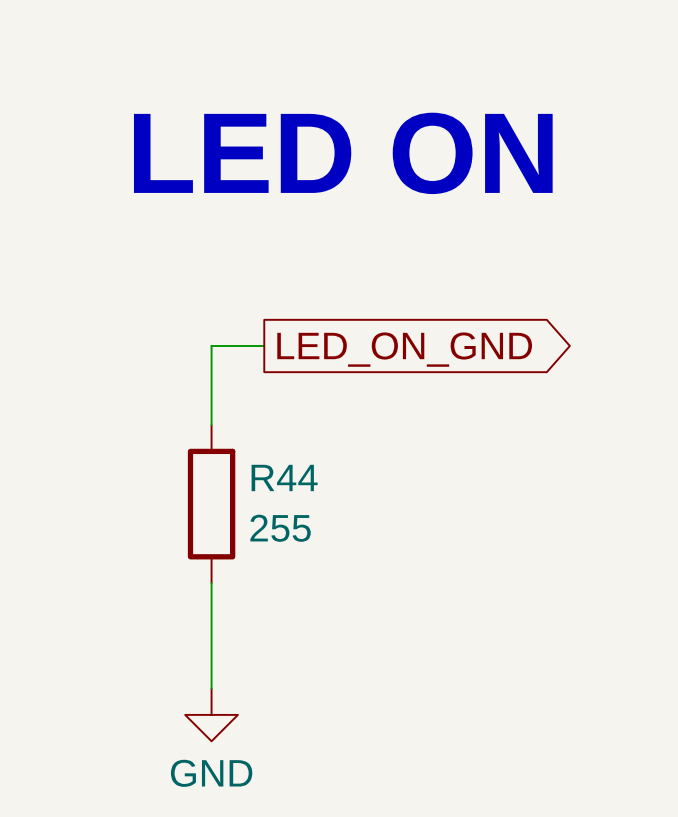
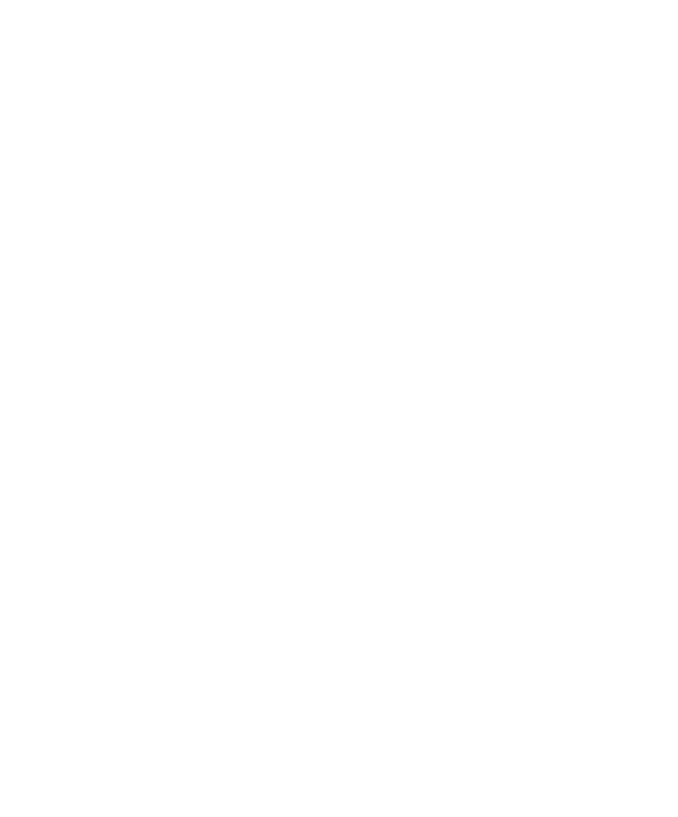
text: LED ON (343, 153) -> none
wire: (264, 346) (211, 346) (211, 425) -> none
global label: LED_ON_GND (404, 349) -> none
R44: 255 (211, 504) -> none
wire: (211, 583) (211, 688) -> none
power symbol: GND (211, 714) -> none

